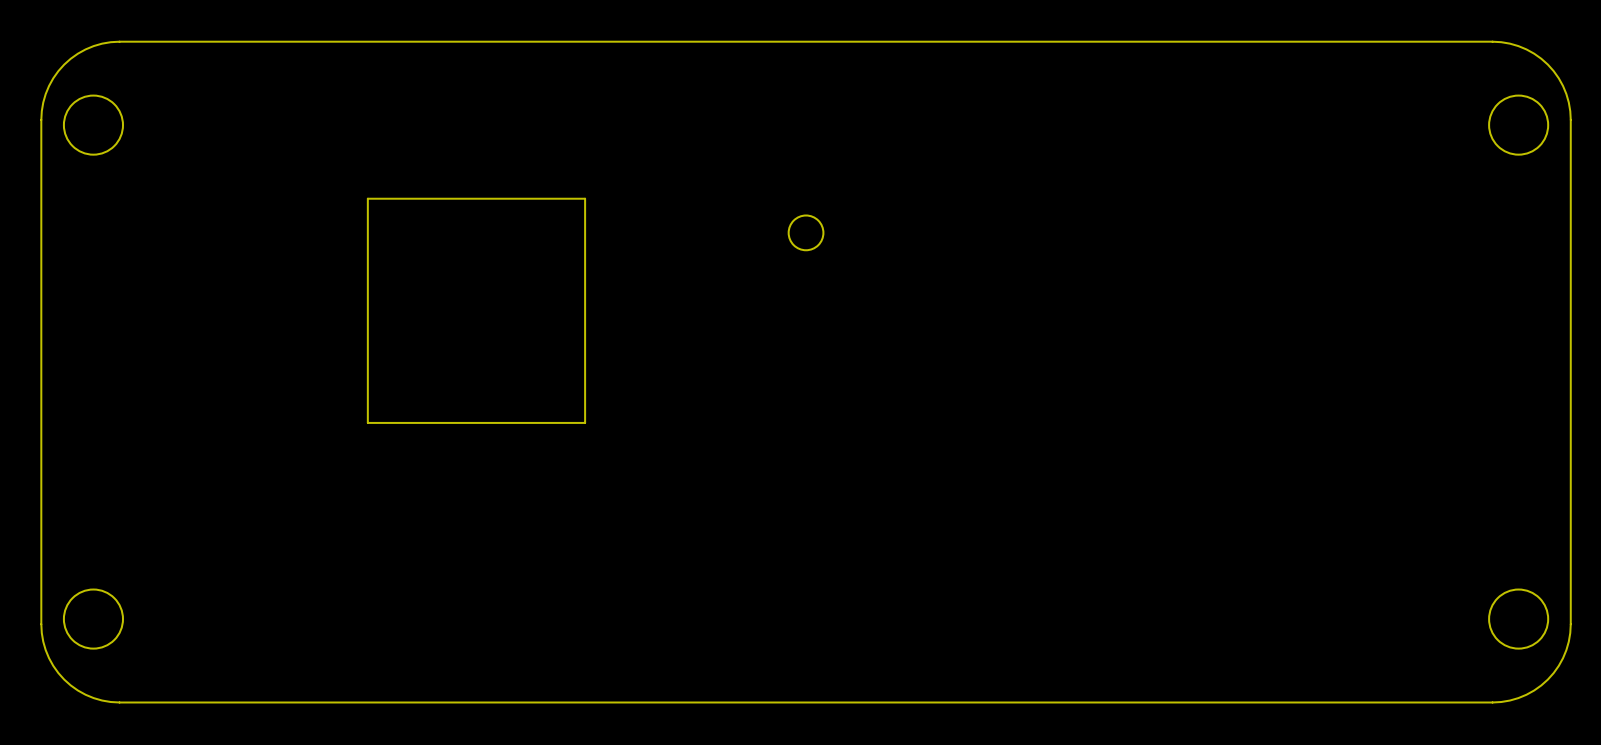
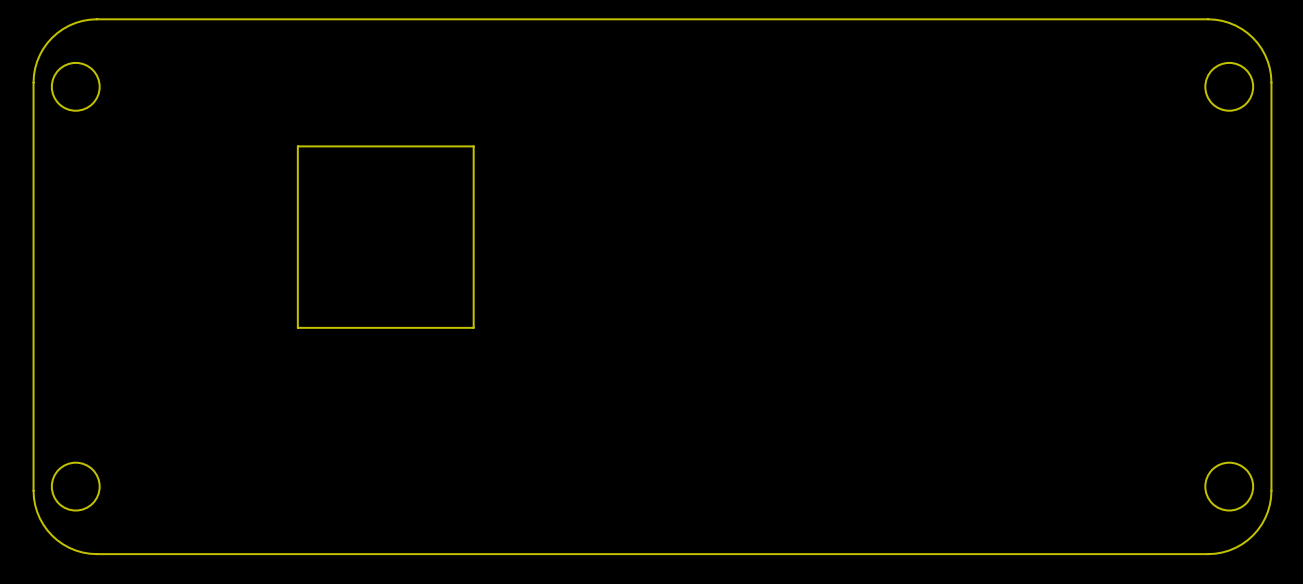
round board edge: [787, 214, 825, 252] -> none

